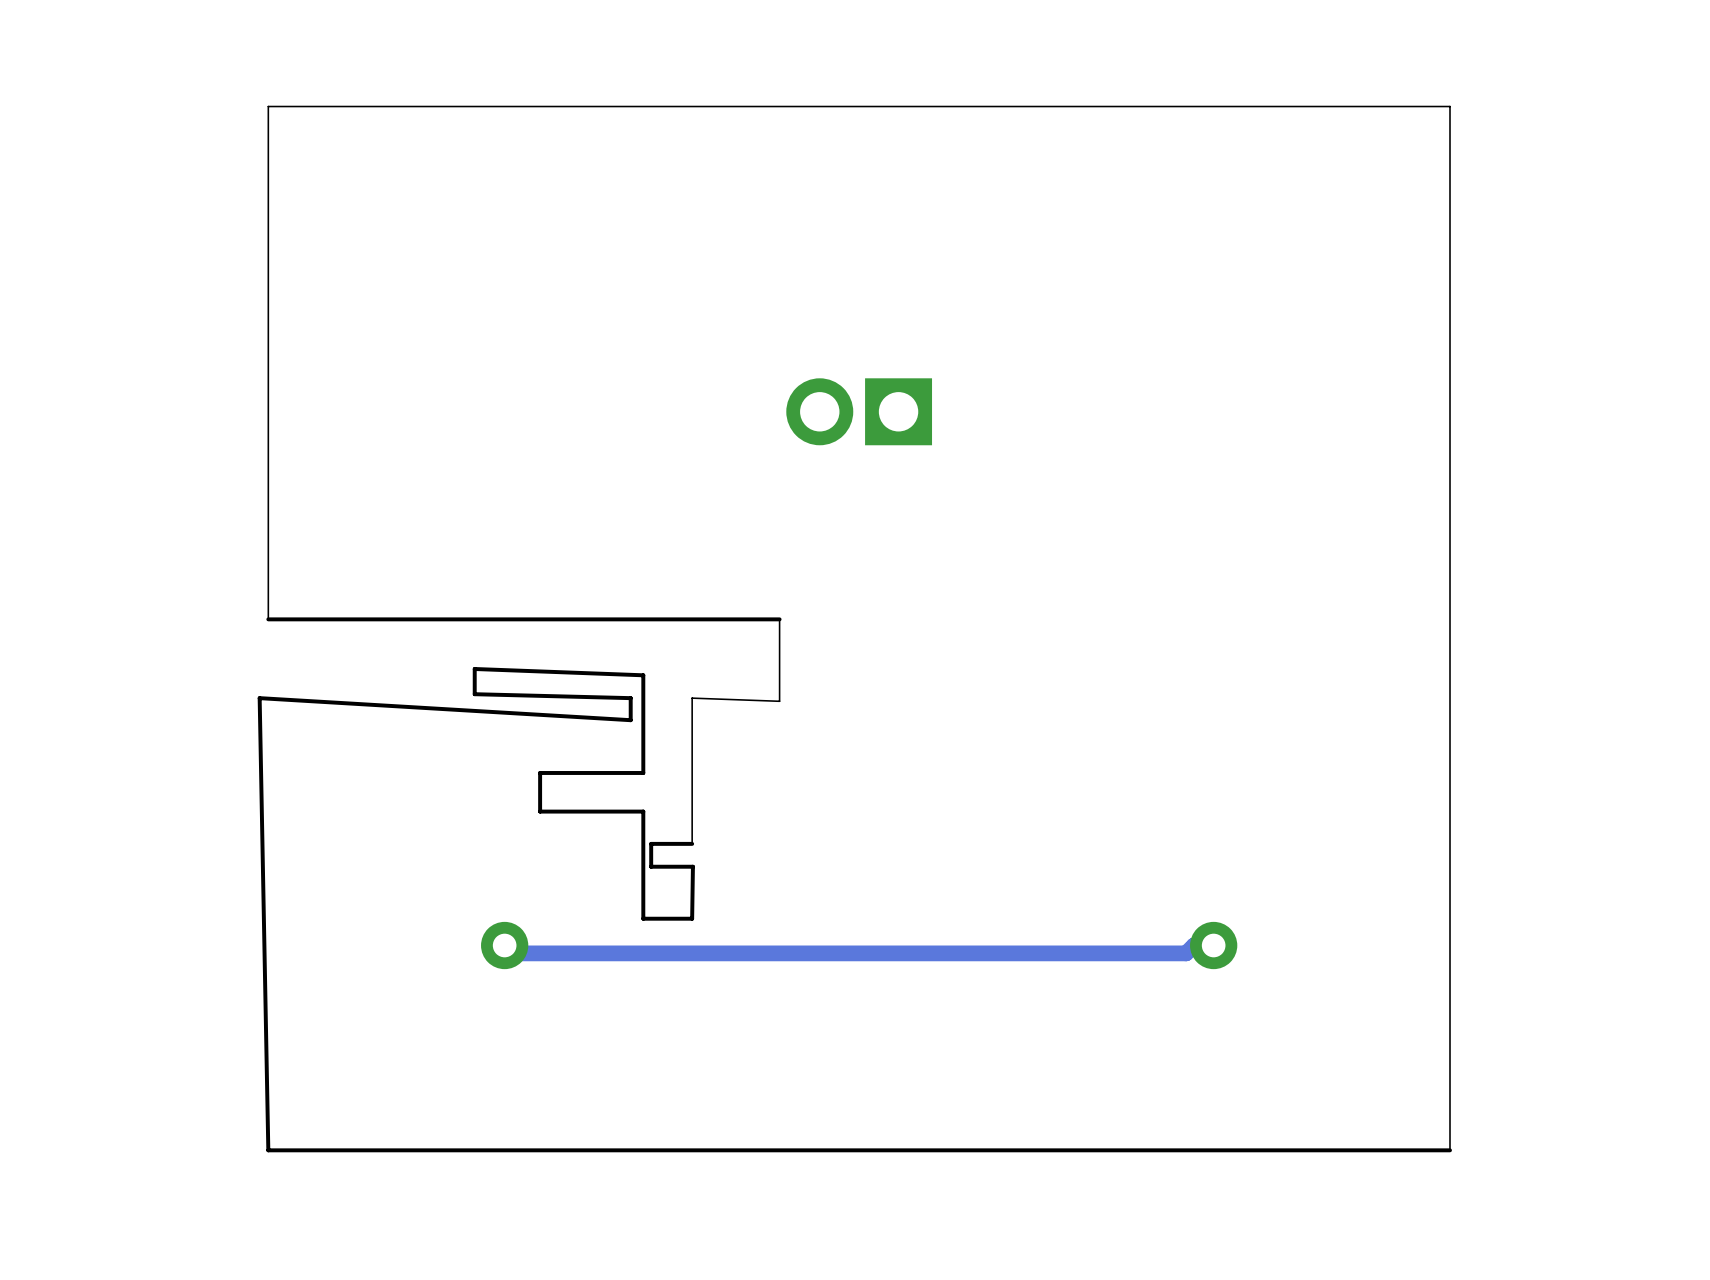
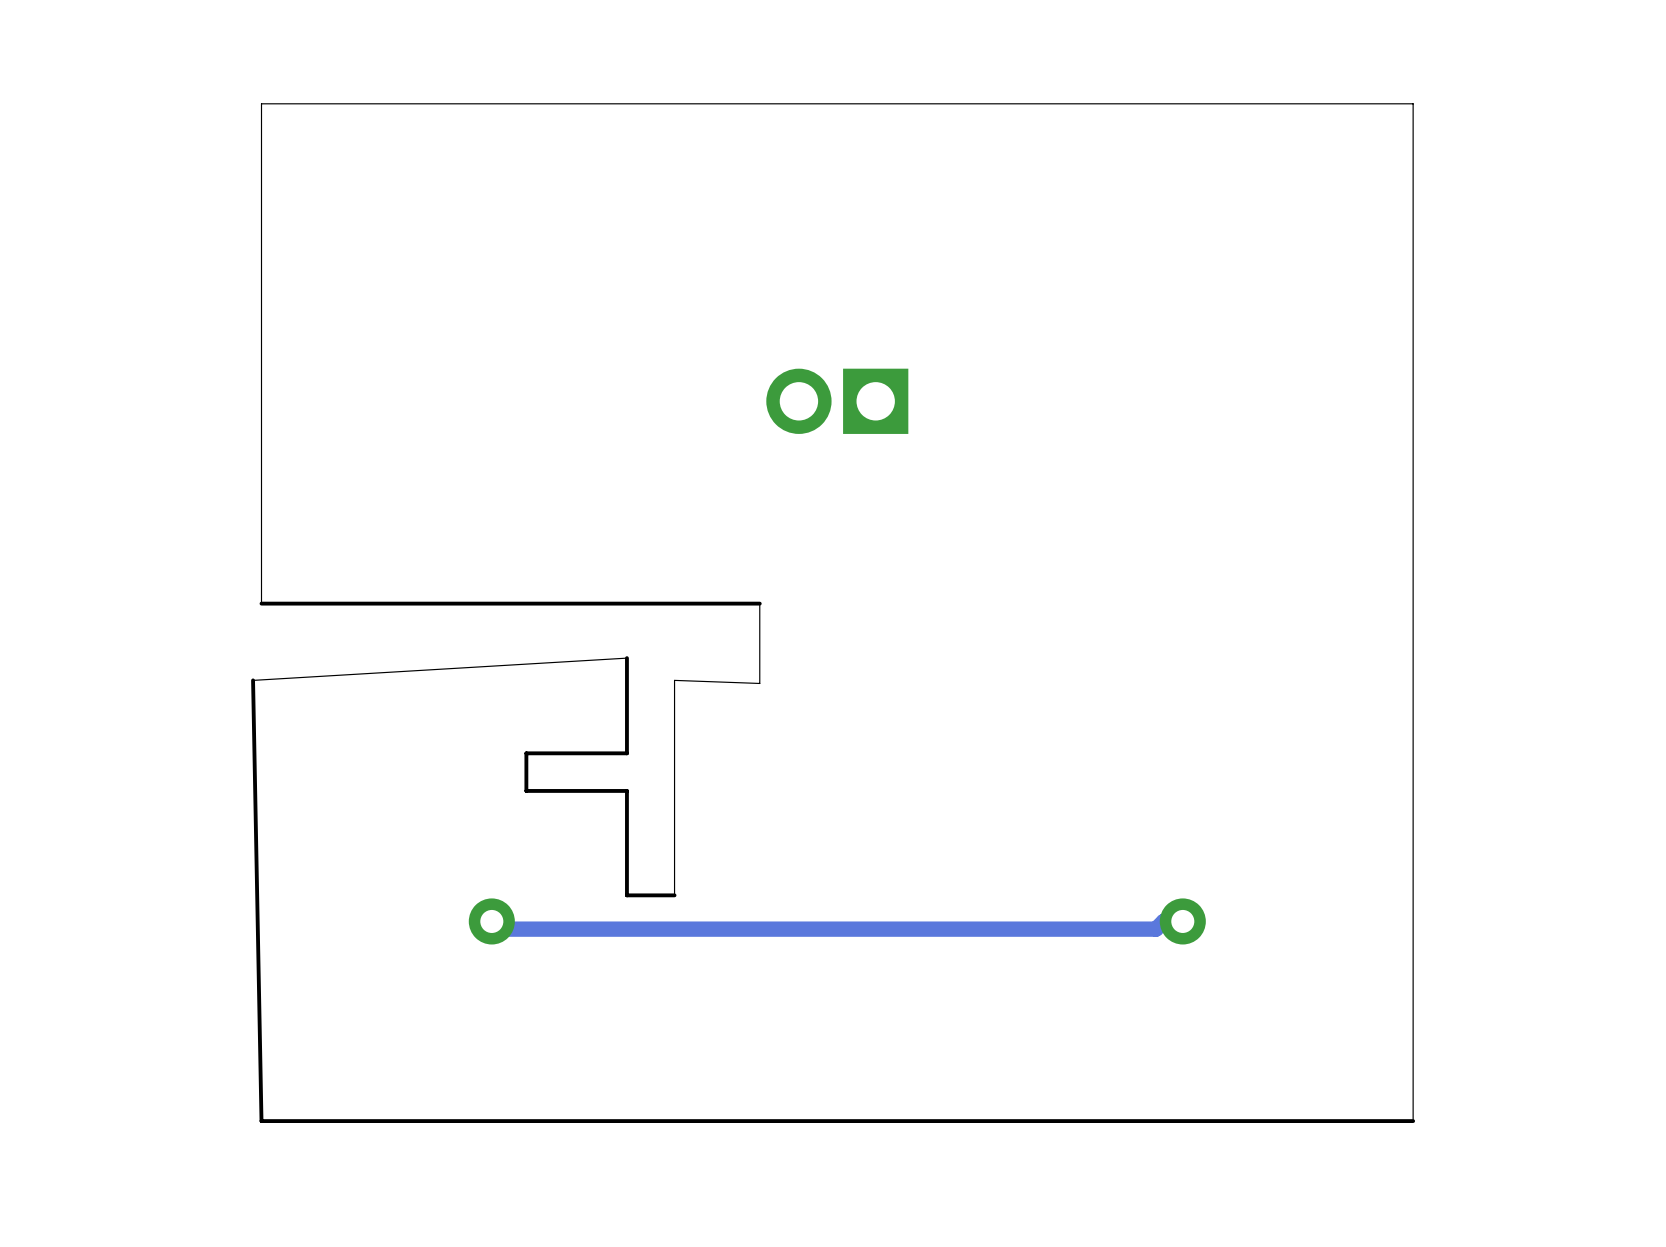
board edge: (643, 675) (474, 668) (474, 694) (630, 698) (630, 720) (259, 698) -> (626, 658) (253, 680)
board edge: (692, 843) (651, 843) (651, 866) (692, 866) (692, 918) -> (674, 822) (674, 895)

